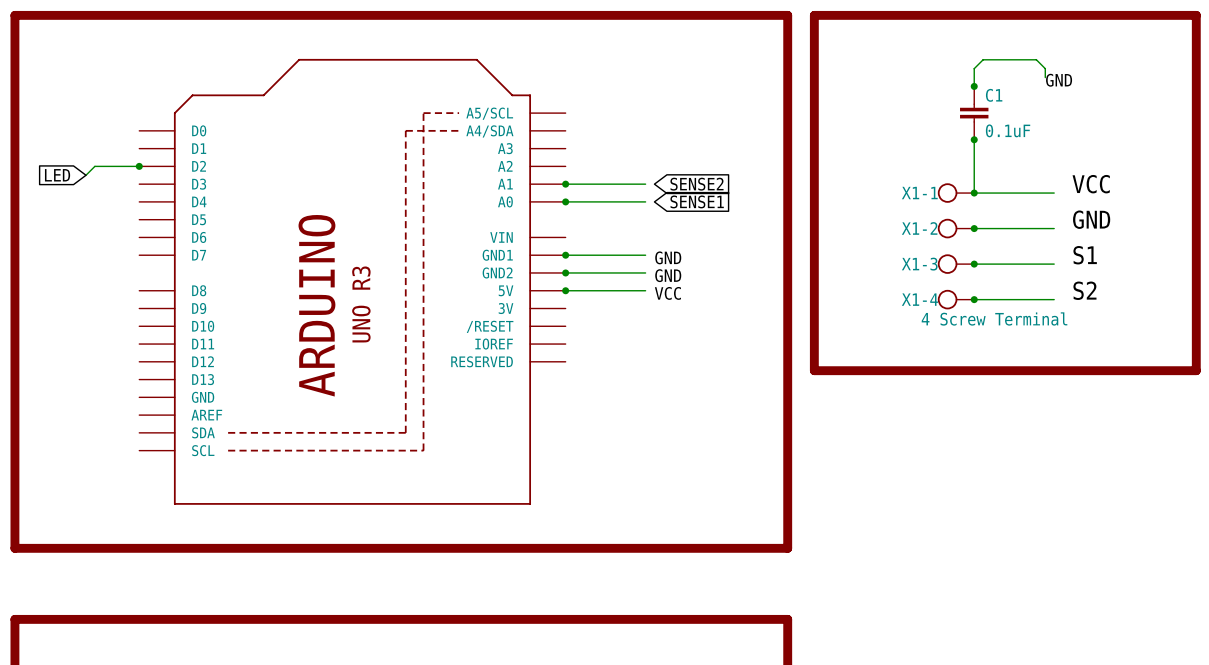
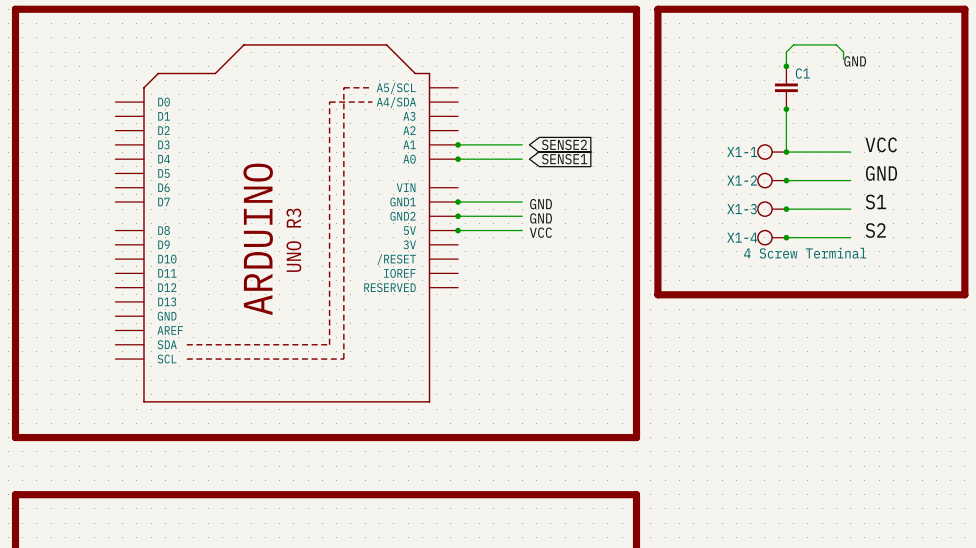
C1 value: 0.1uF (1008, 130) -> none
wire: (139, 166) (94, 166) (85, 175) -> none
junction: (139, 166) -> none
global label: LED (57, 175) -> none

